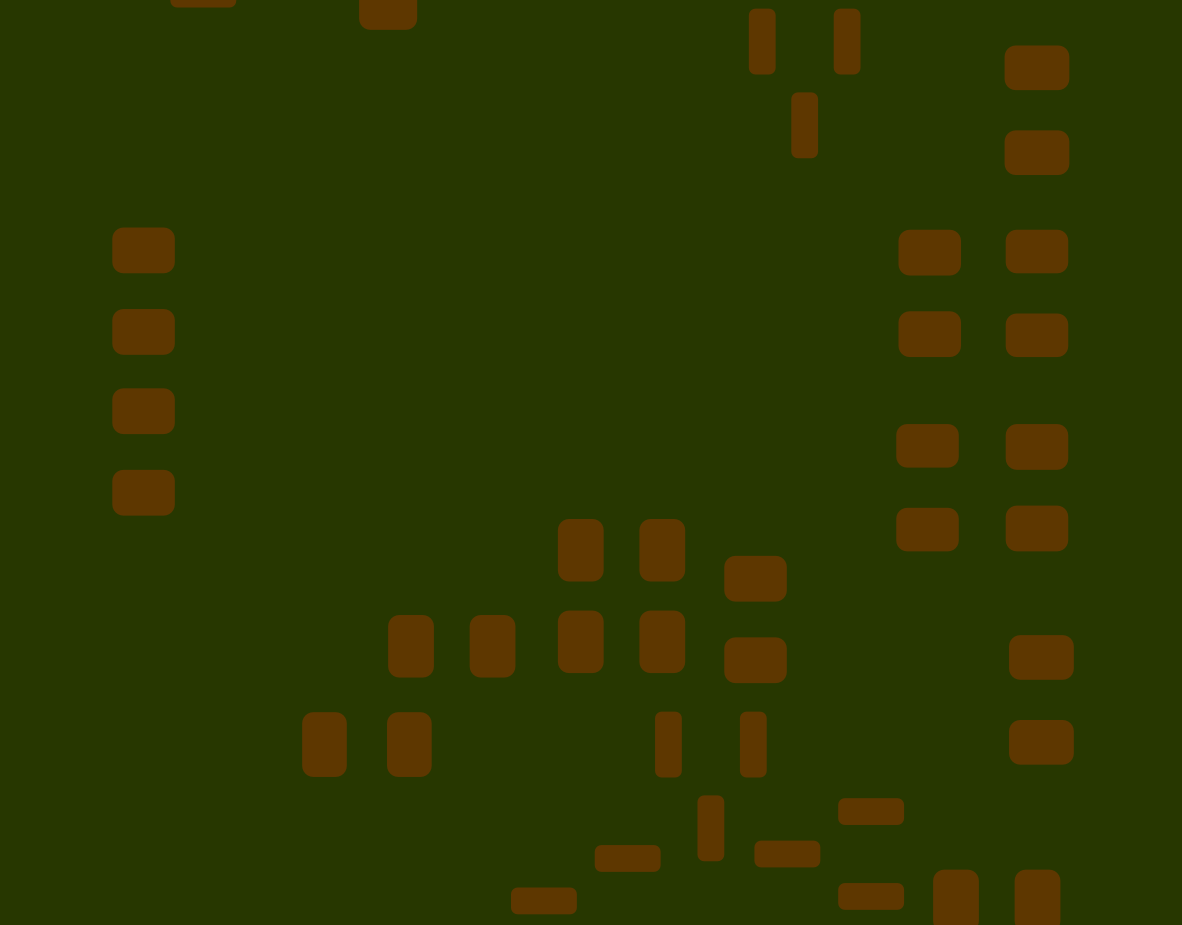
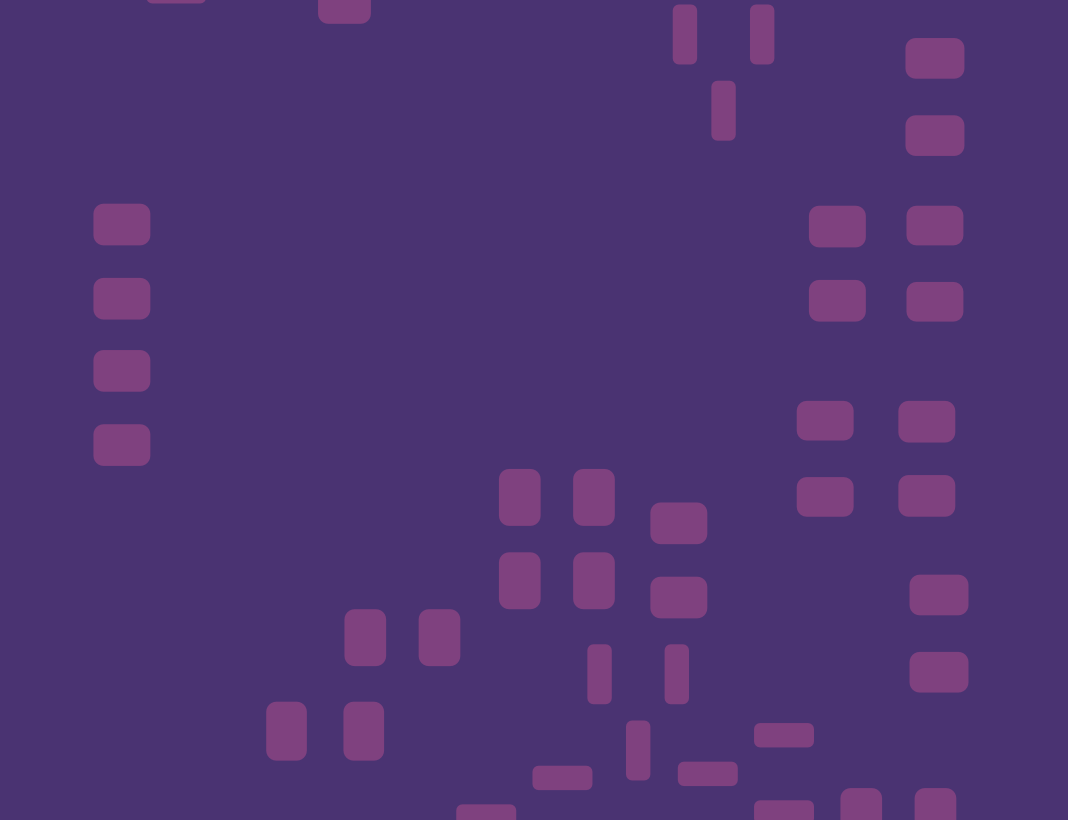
part position: (927, 487) -> (825, 458)
part position: (1036, 487) -> (926, 458)
part position: (451, 646) -> (402, 637)
part position: (366, 744) -> (325, 731)

